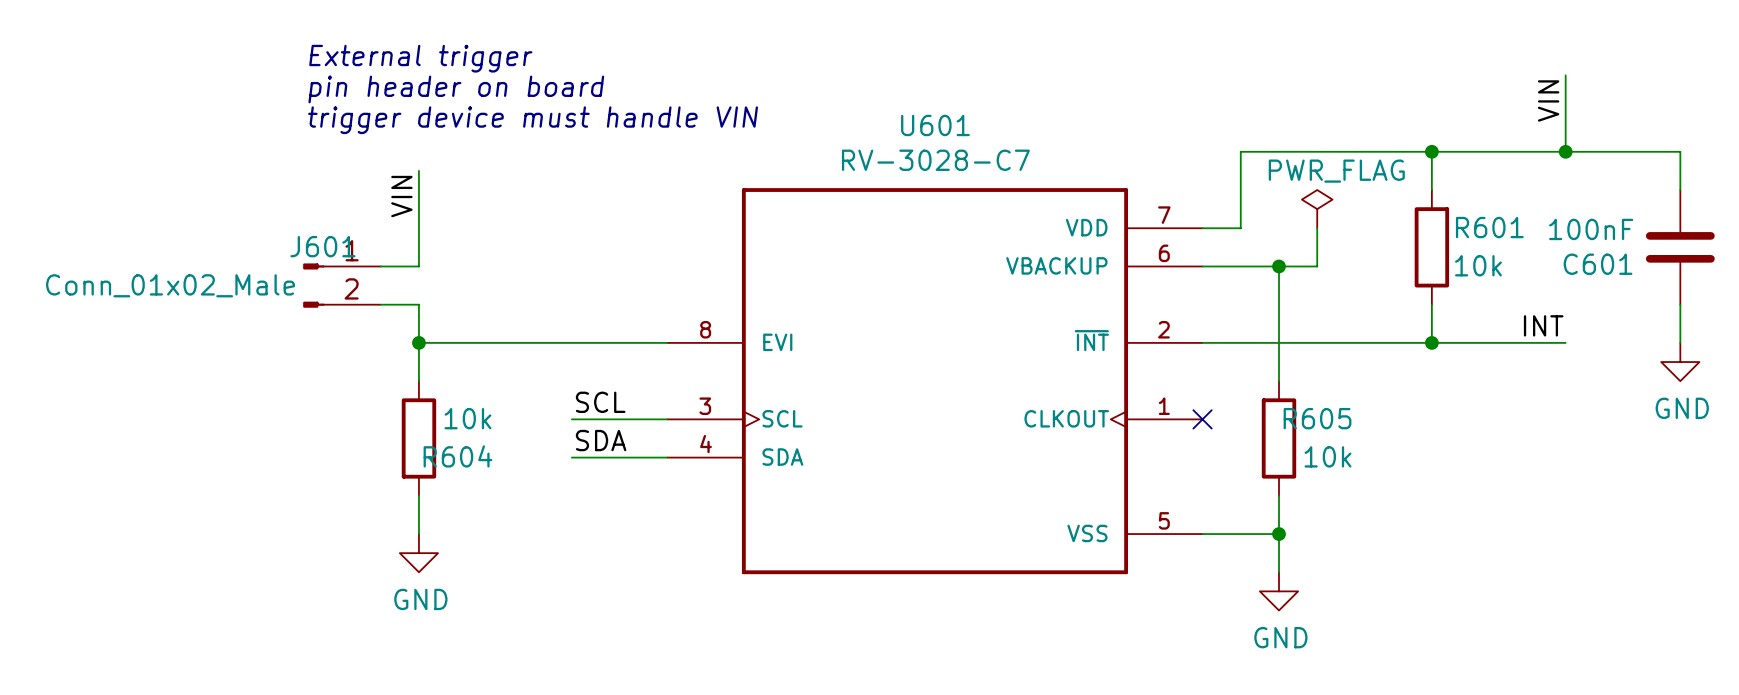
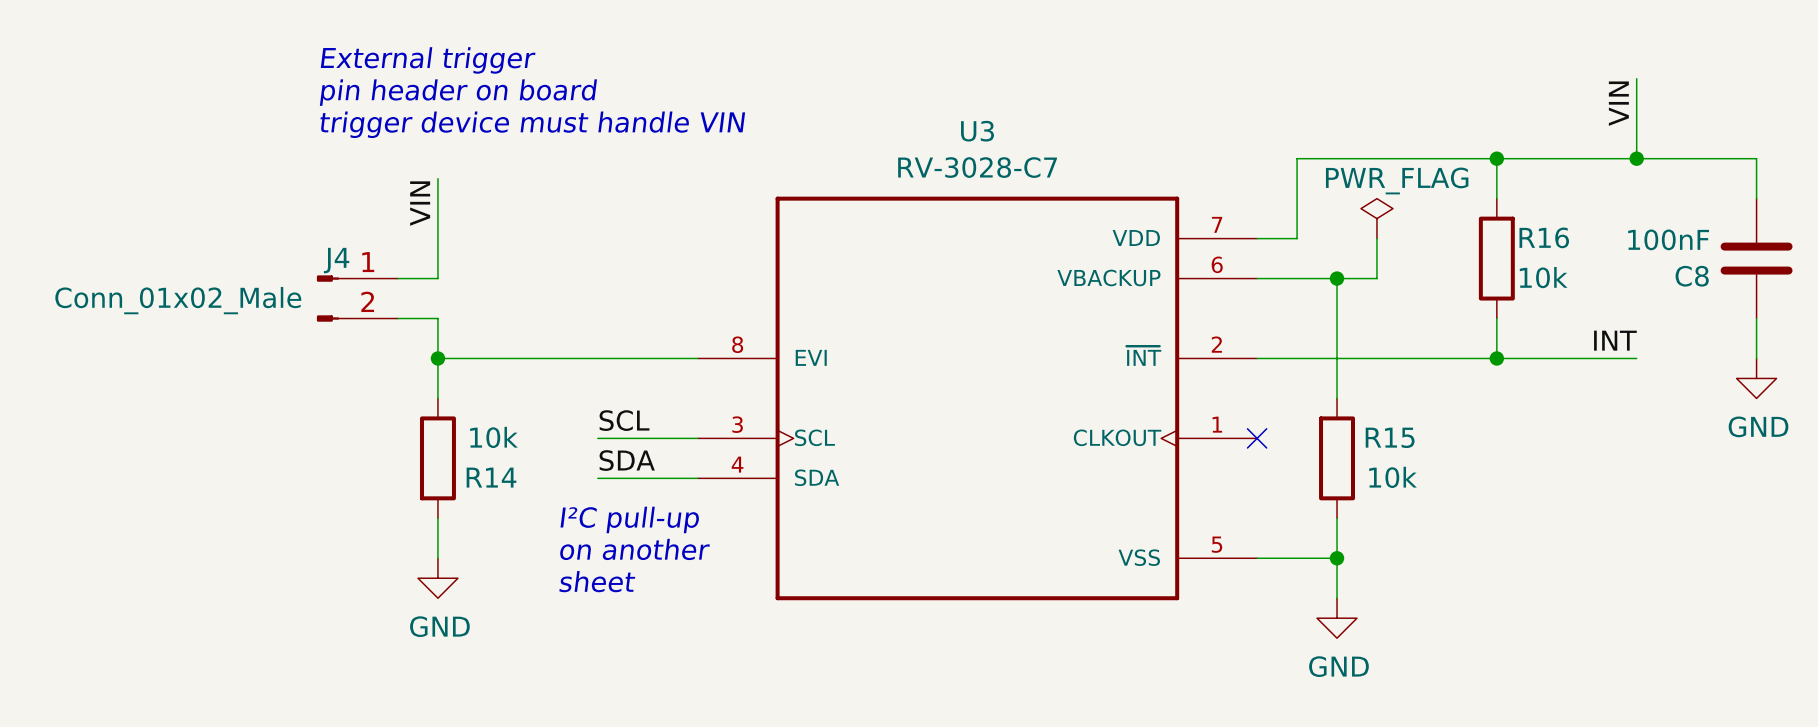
U601 name: U601 (935, 125) -> U3 (977, 131)
R601 name: R601 (1489, 227) -> R16 (1544, 237)
J601 name: J601 (322, 246) -> J4 (336, 260)
C601 name: C601 (1598, 264) -> C8 (1692, 276)
R605 name: R605 (1317, 418) -> R15 (1390, 437)
R604 name: R604 (457, 456) -> R14 (491, 477)
text: none -> I²C pull-up (629, 519)
text: none -> on another (634, 549)
text: none -> sheet (597, 581)

